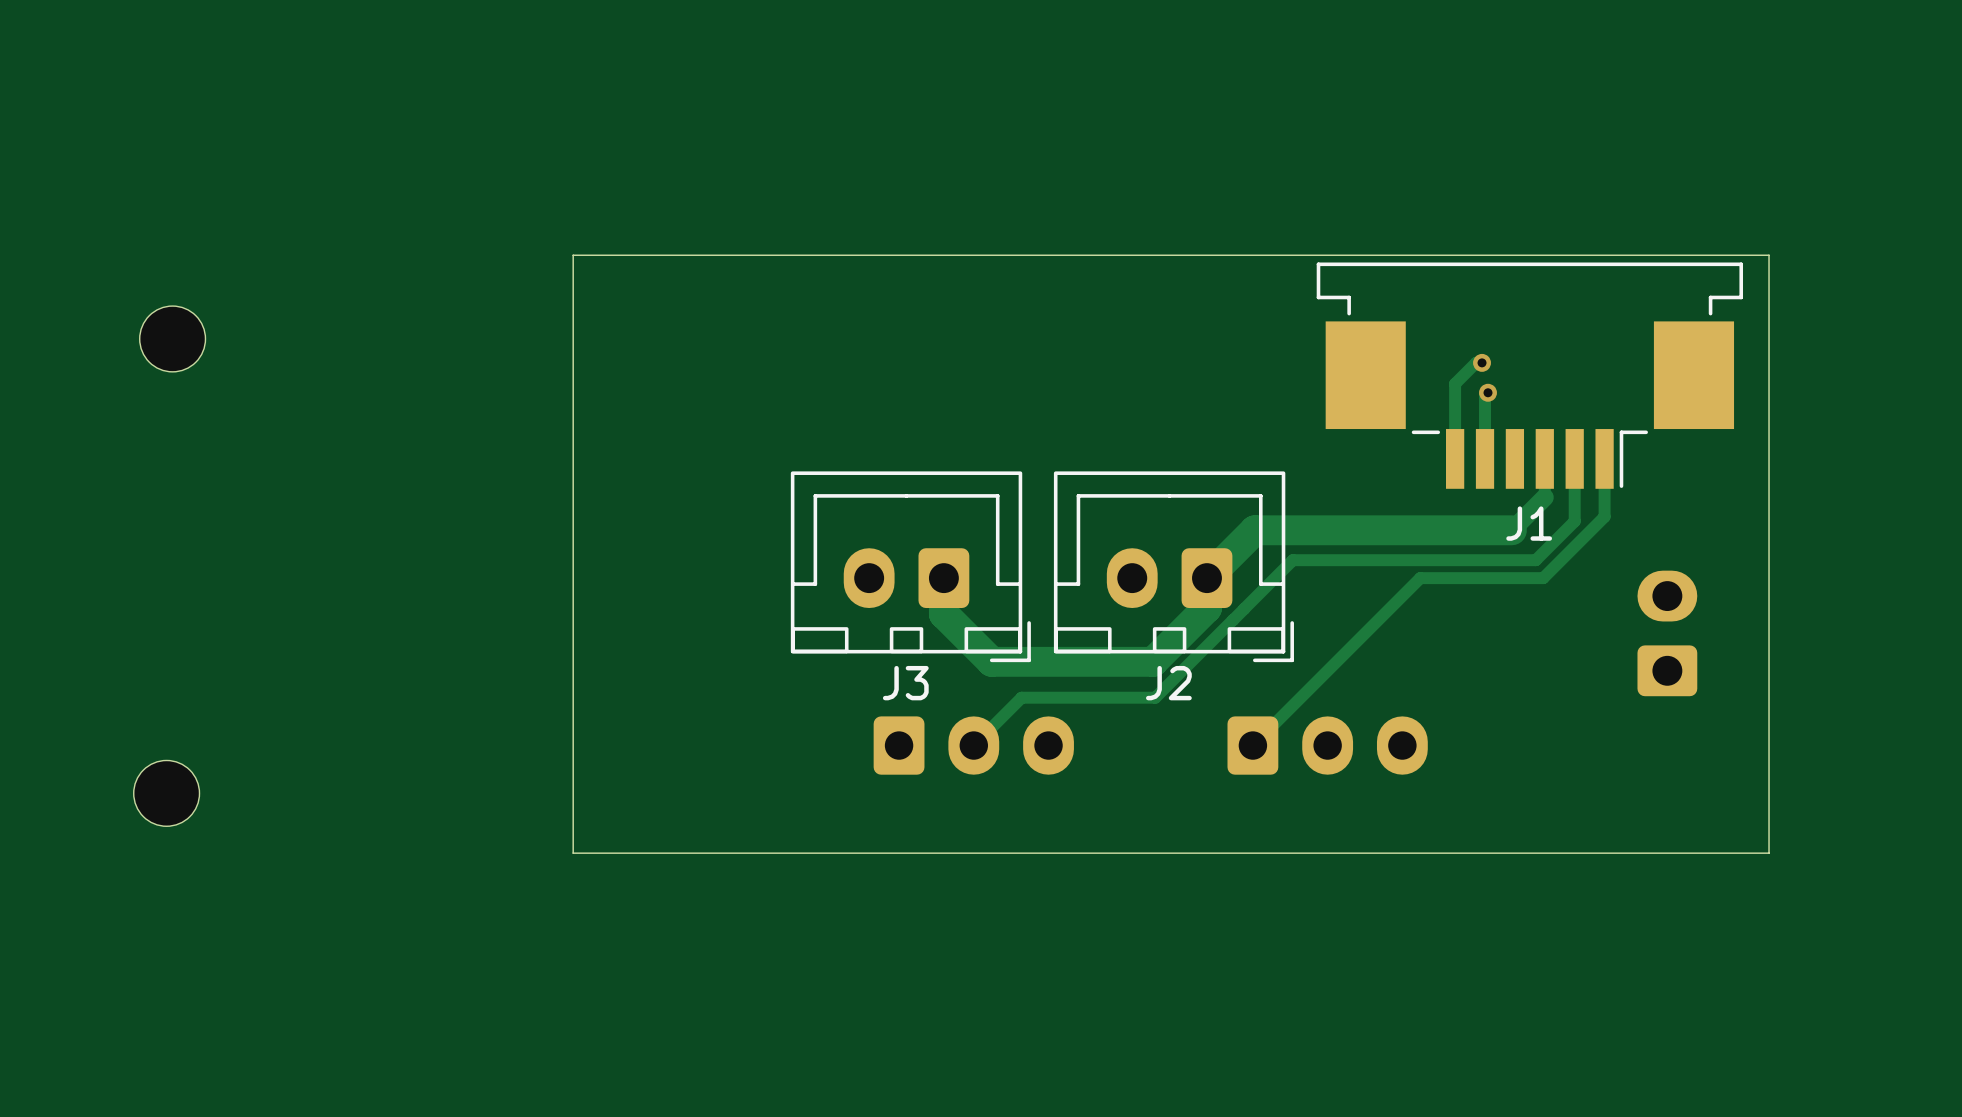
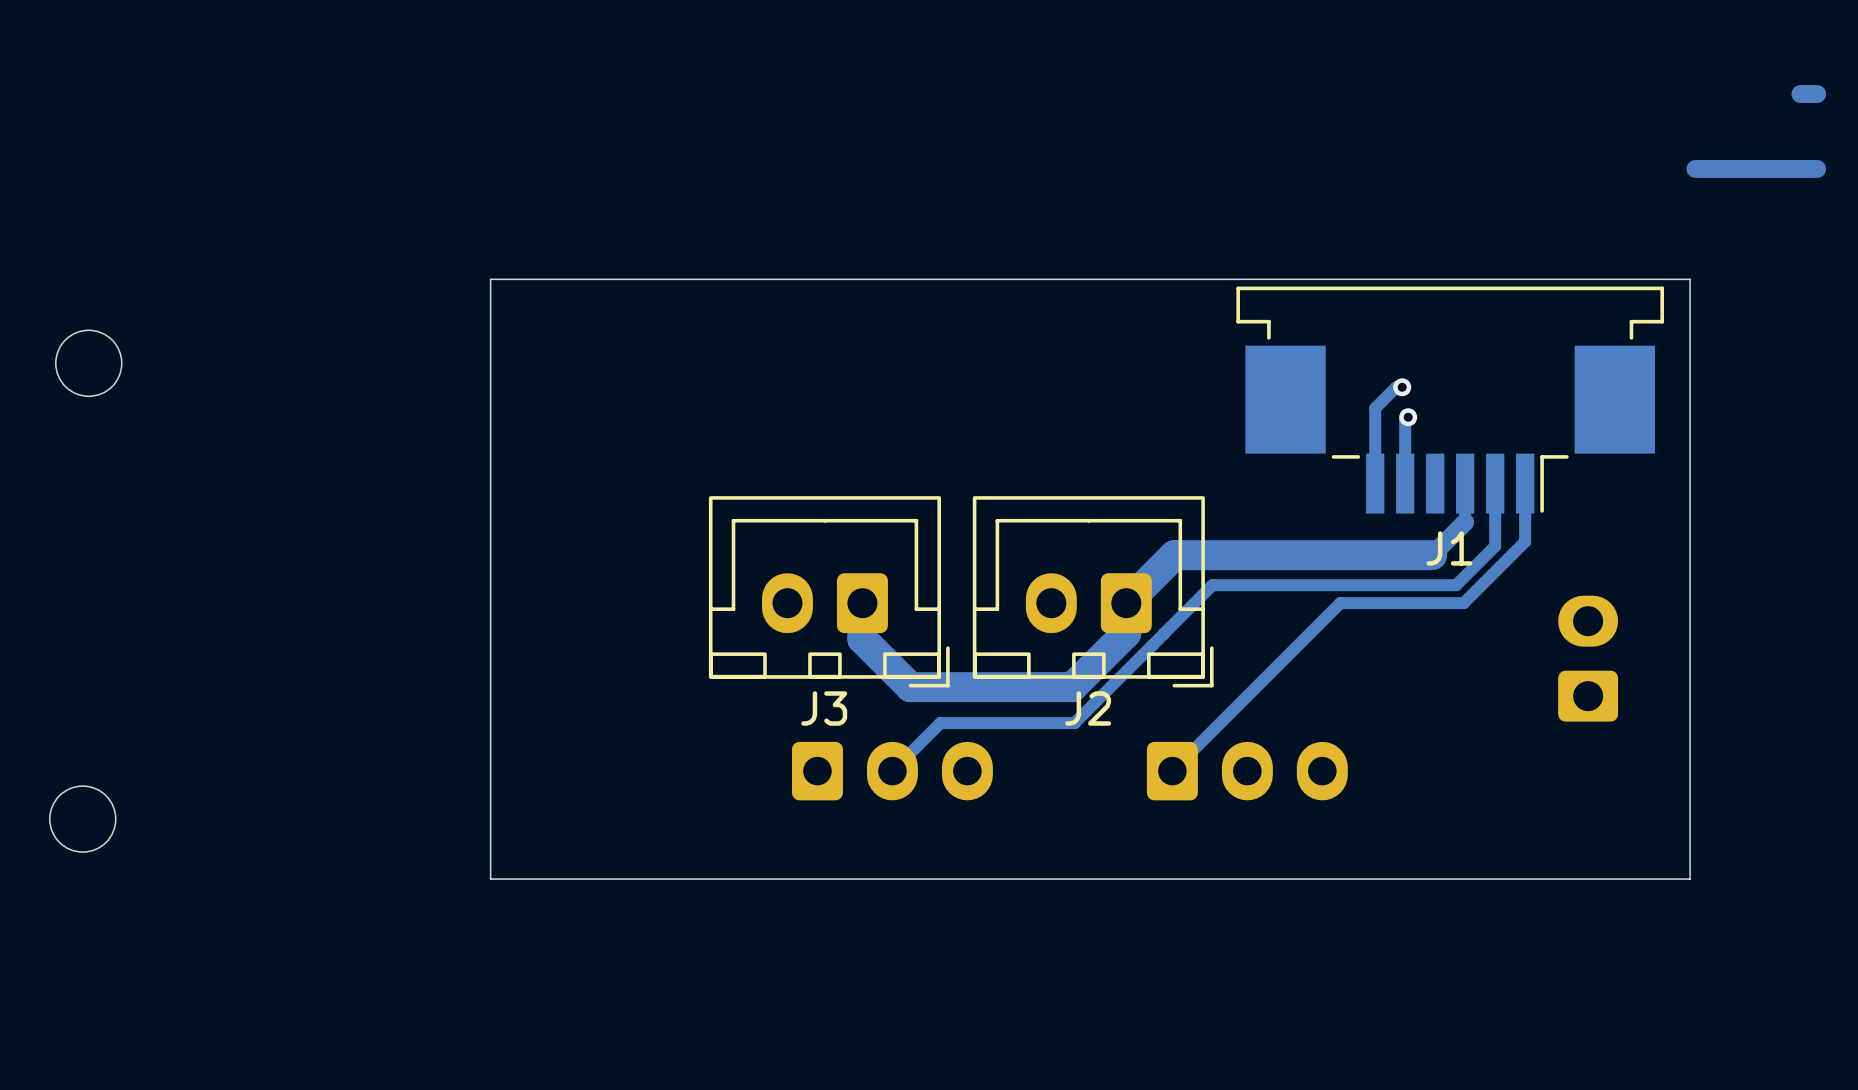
track: none -> (1817, 94) (1800, 94)
track: none -> (1817, 168) (1695, 168)

